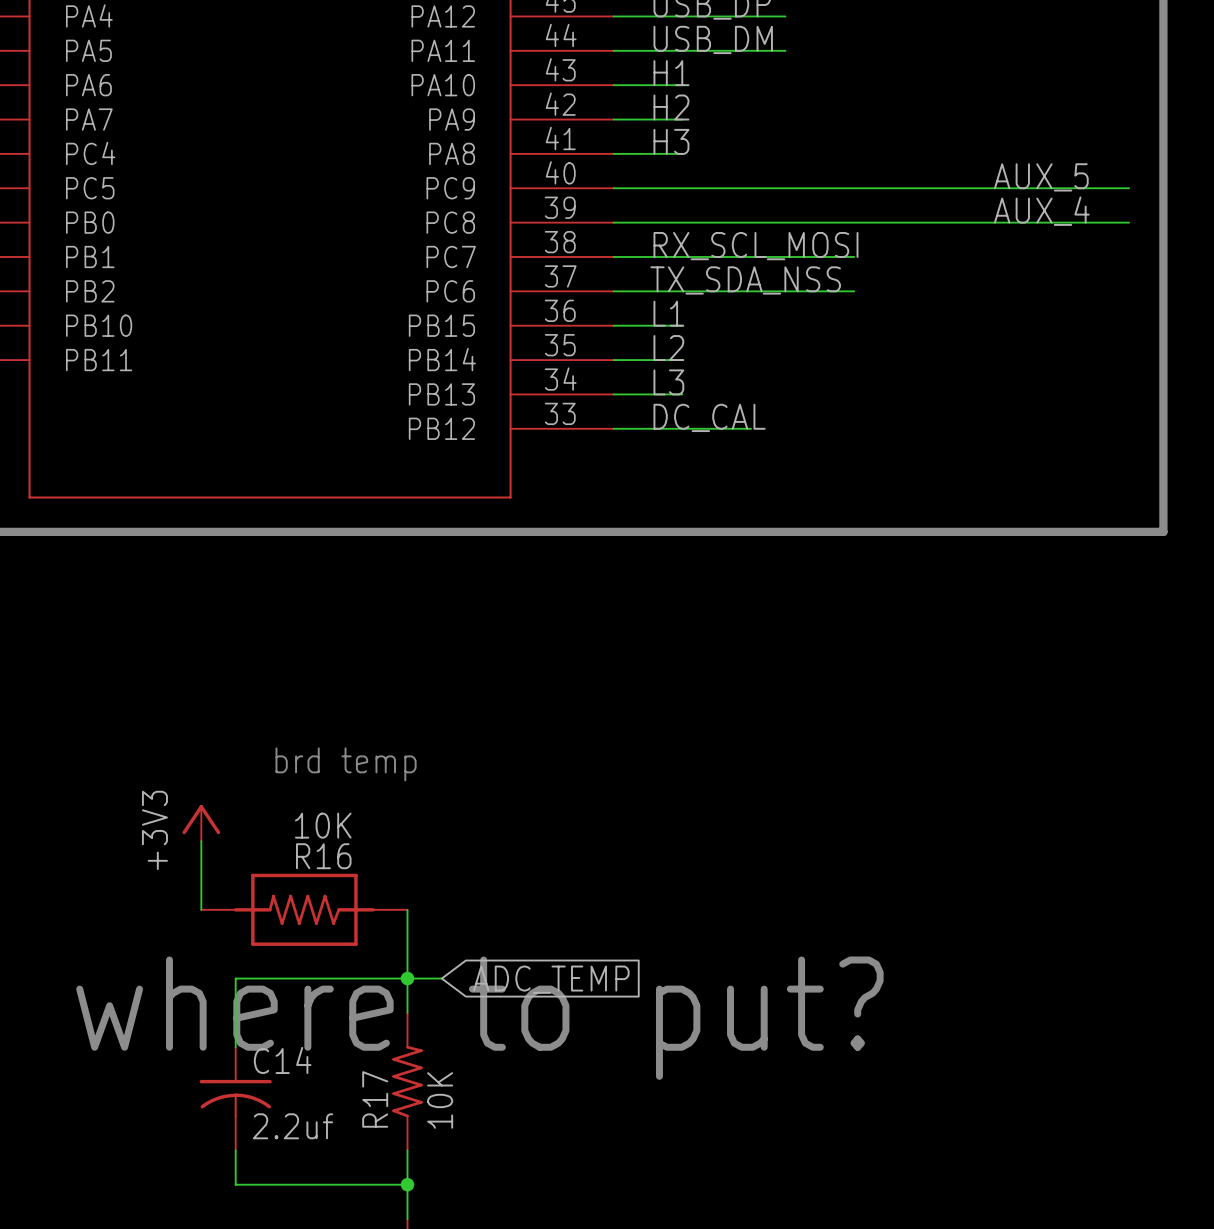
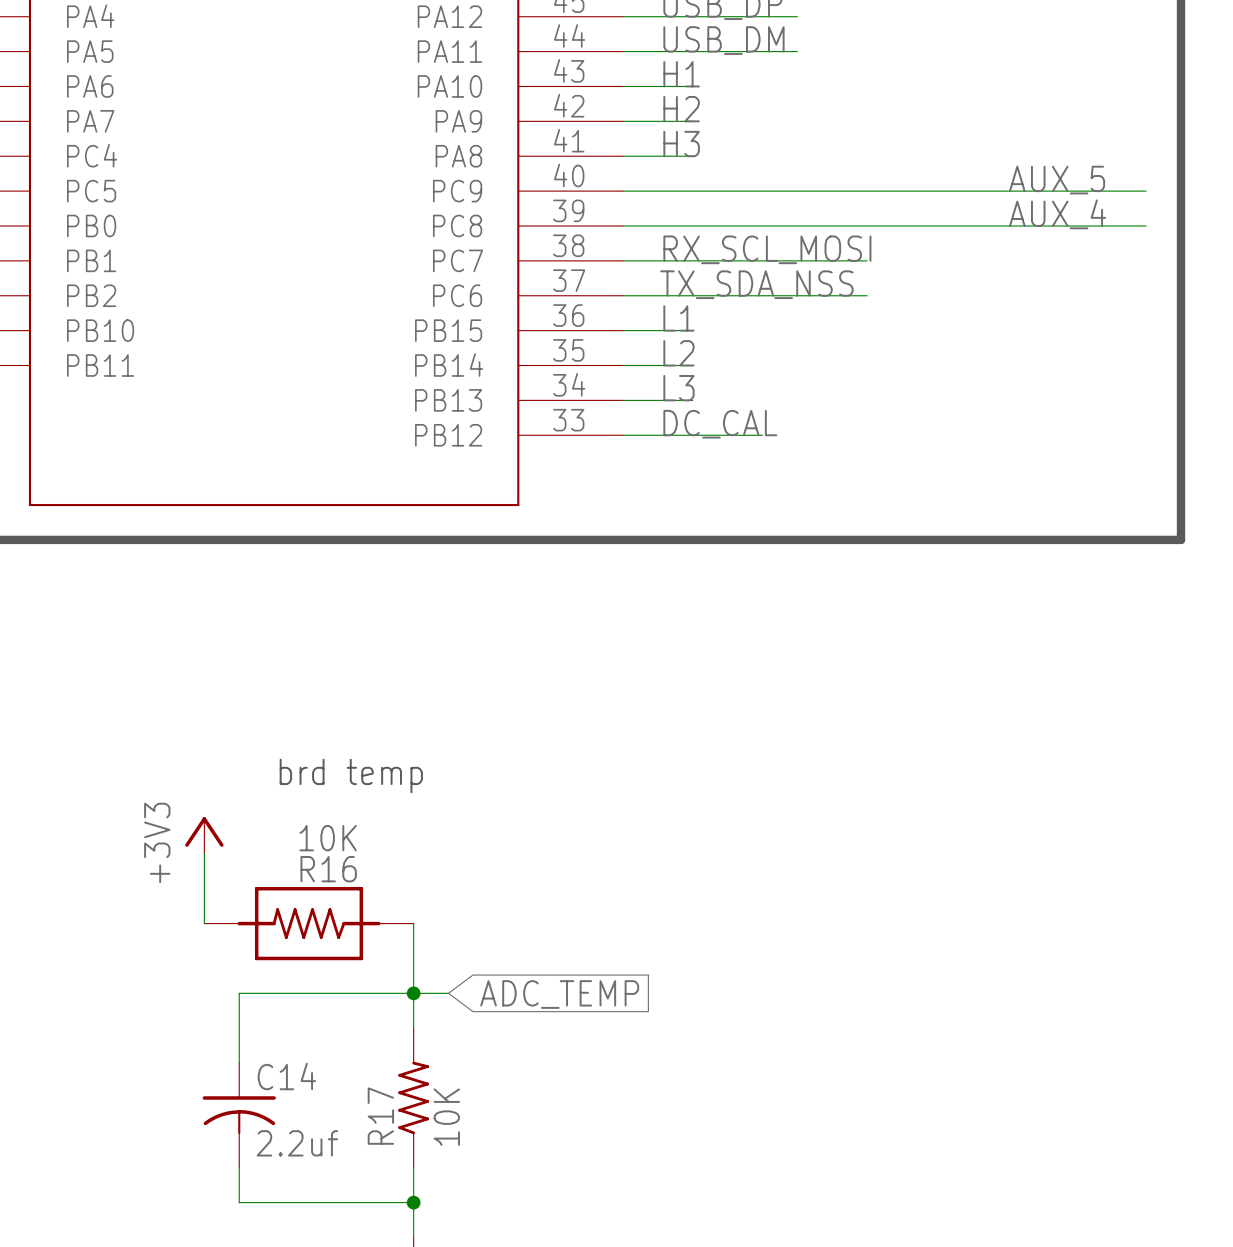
text: where to put? (479, 1018) -> none

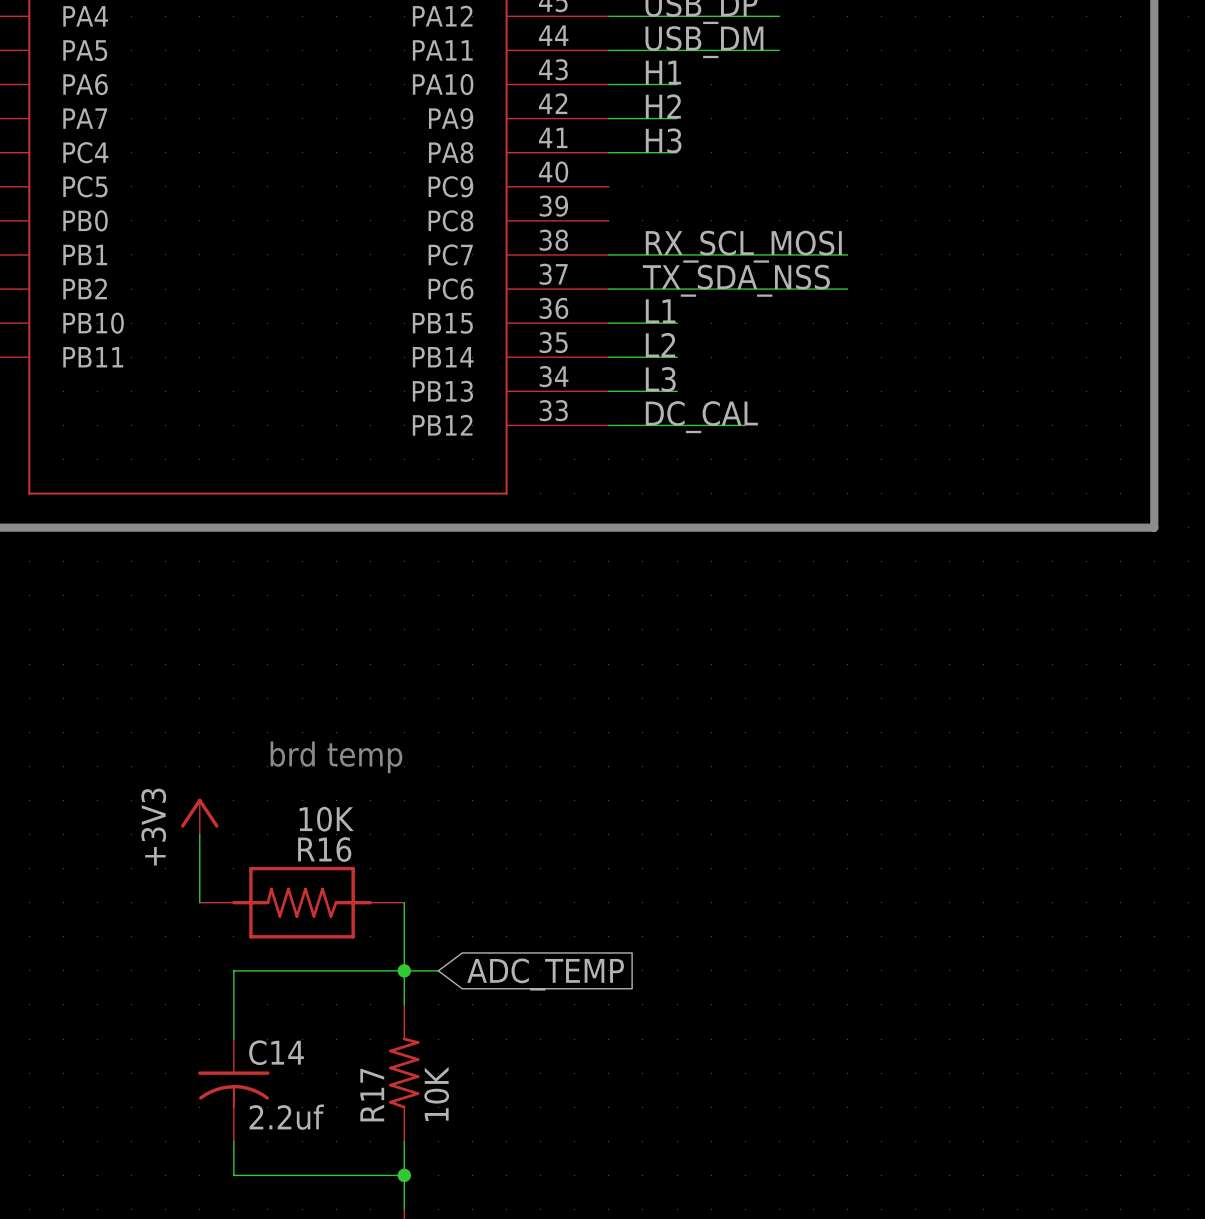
label: AUX_5 (1057, 180) -> none
wire: (622, 191) (1146, 191) -> none
label: AUX_4 (1057, 214) -> none
wire: (622, 225) (1146, 225) -> none

